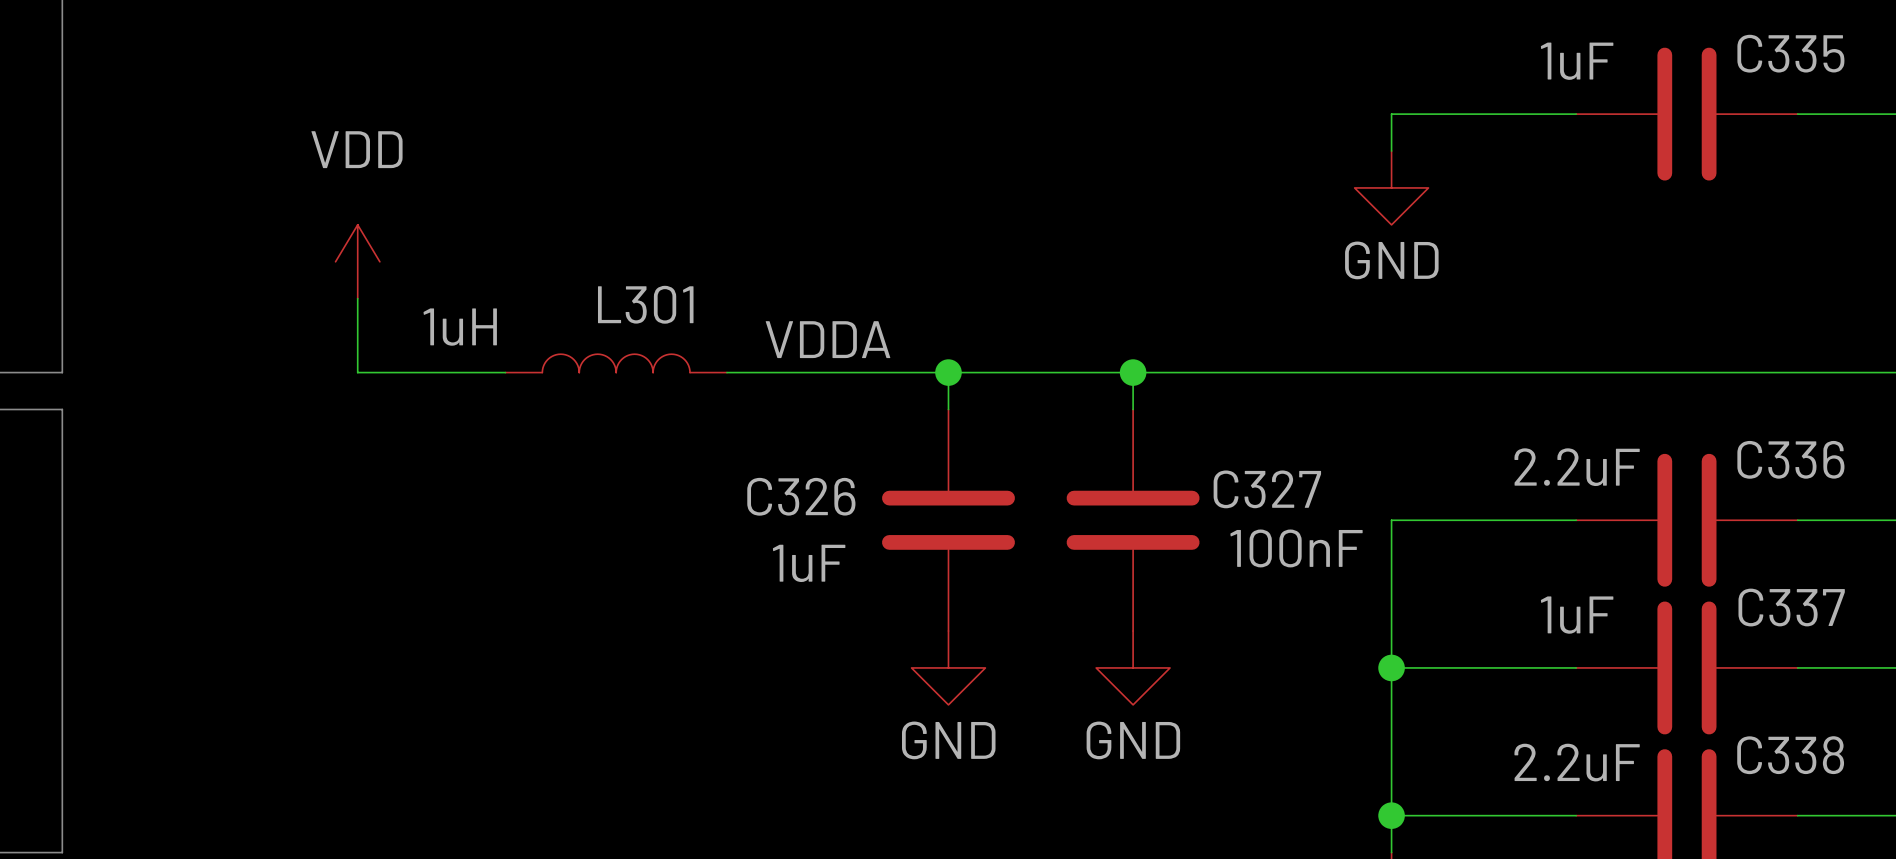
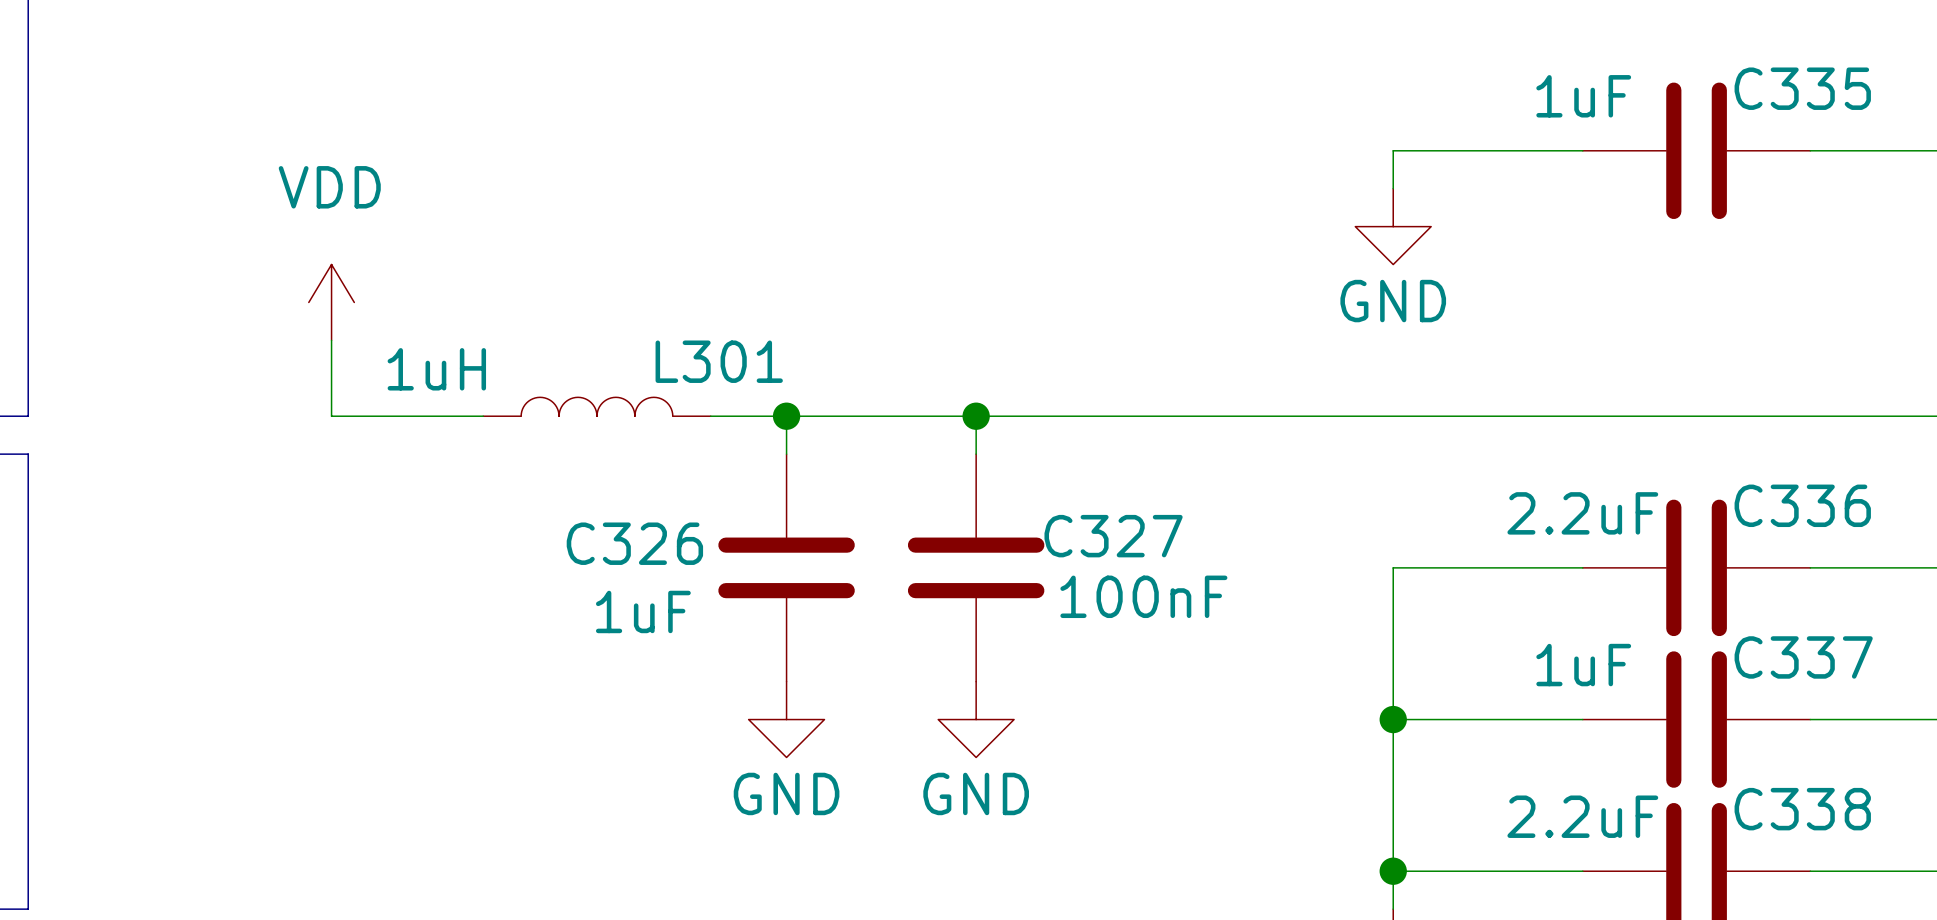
L301 name position: L301 (645, 304) -> L301 (719, 361)
label: VDDA (828, 339) -> none
junction: none -> (786, 416)
wire: (948, 372) (948, 409) -> (786, 416) (786, 454)
junction position: (948, 372) -> (976, 416)
wire: (1133, 372) (1133, 409) -> (976, 416) (976, 454)
junction: (1133, 372) -> none
C326 position: (948, 520) -> (786, 567)
C327 position: (1133, 520) -> (976, 567)
power symbol: none -> GND (786, 719)
power symbol position: GND (948, 667) -> GND (976, 719)
power symbol: GND (1133, 667) -> none

